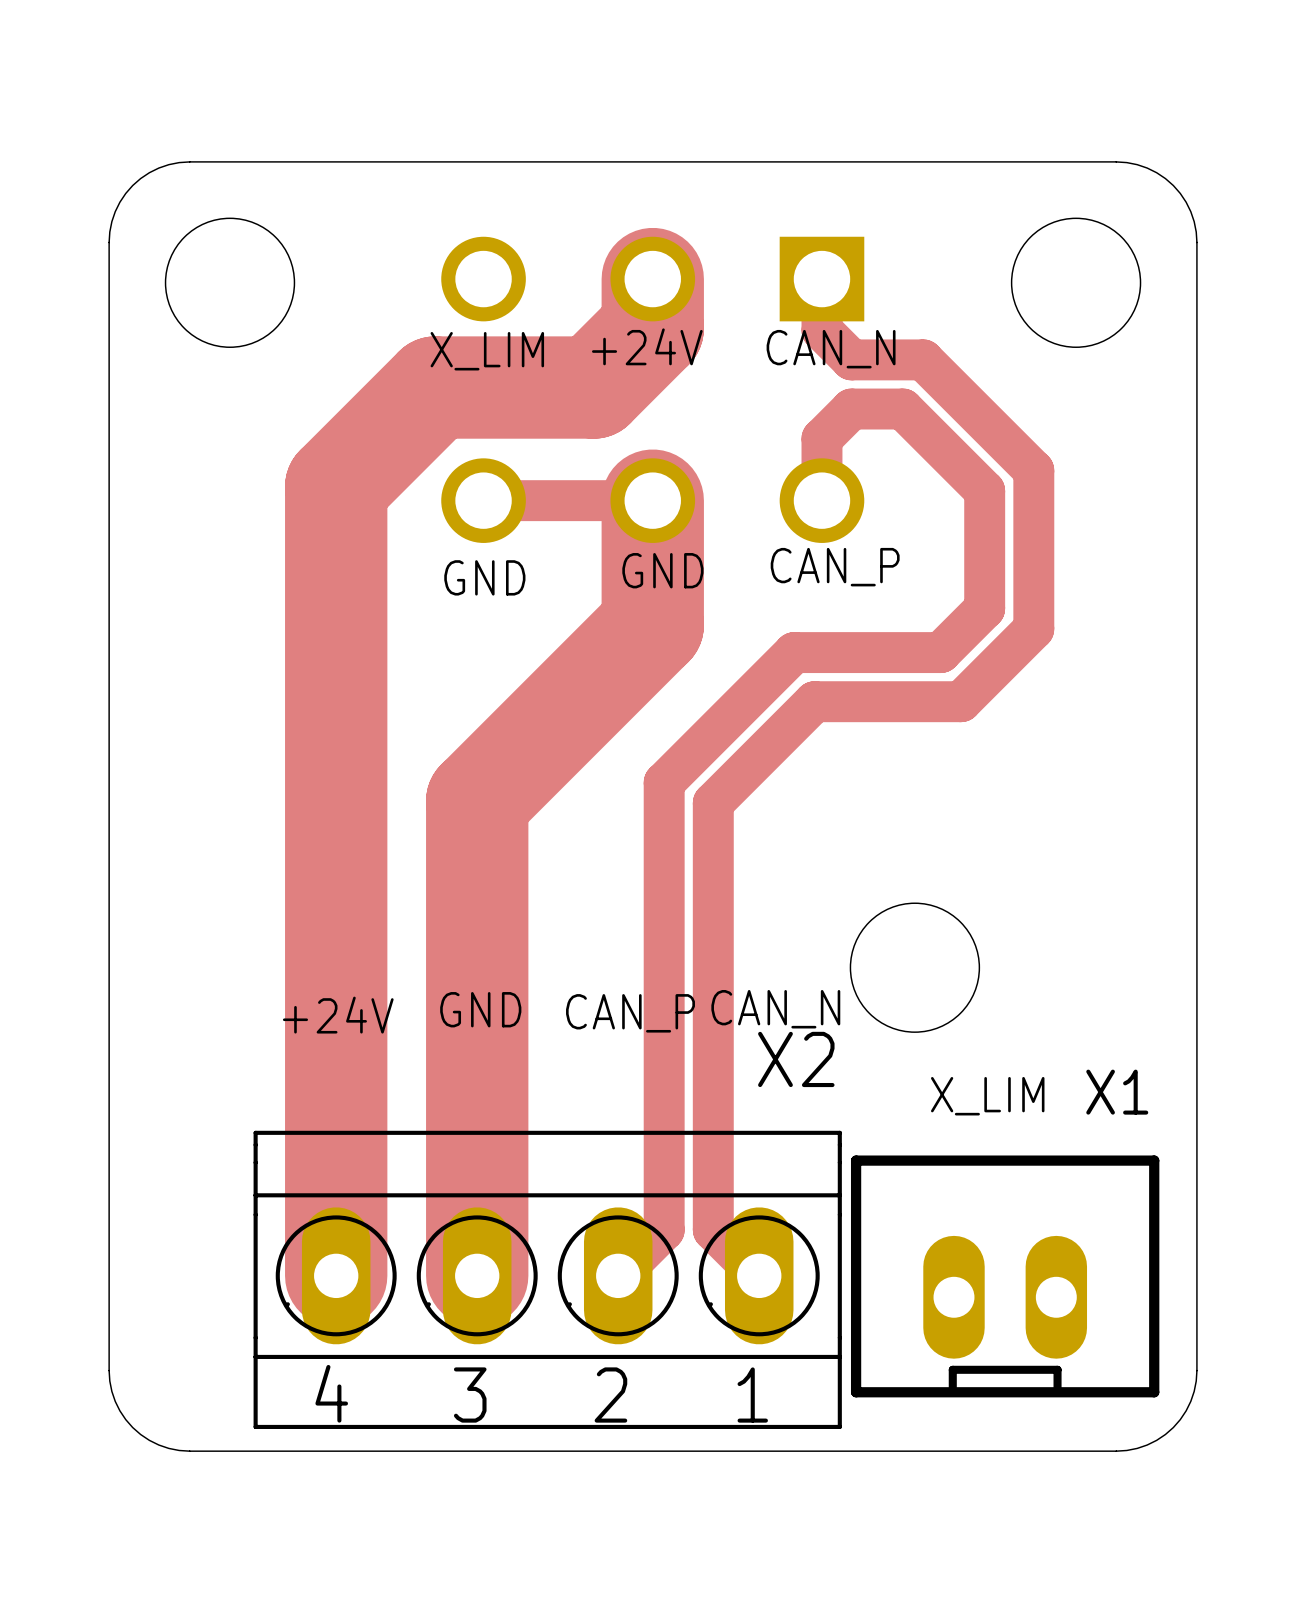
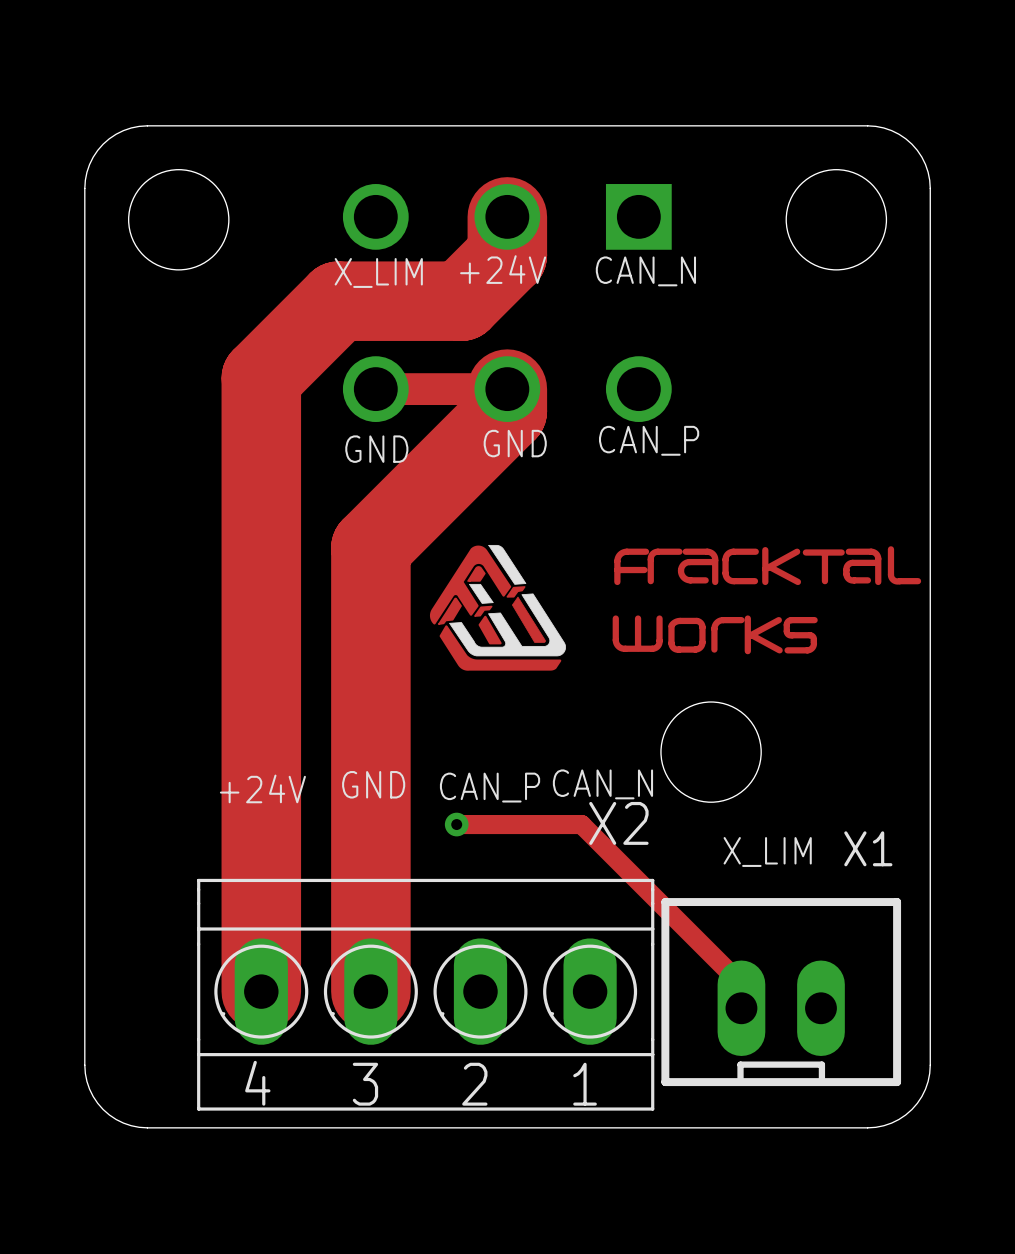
track: (821, 279) (821, 330) (851, 359) (923, 359) (1033, 470) (1033, 628) (961, 701) (814, 701) (713, 803) (713, 1229) (759, 1275) -> none
track: (821, 500) (821, 438) (851, 409) (902, 409) (984, 490) (984, 608) (940, 652) (794, 652) (664, 782) (664, 1229) (618, 1275) -> none
track: (652, 529) (652, 625) (477, 800) -> (507, 411) (370, 547) (370, 622)
drawing: none -> [429, 544, 922, 671]
track: none -> (456, 824) (581, 824) (741, 984) (741, 1008)
via: none -> (456, 824)

